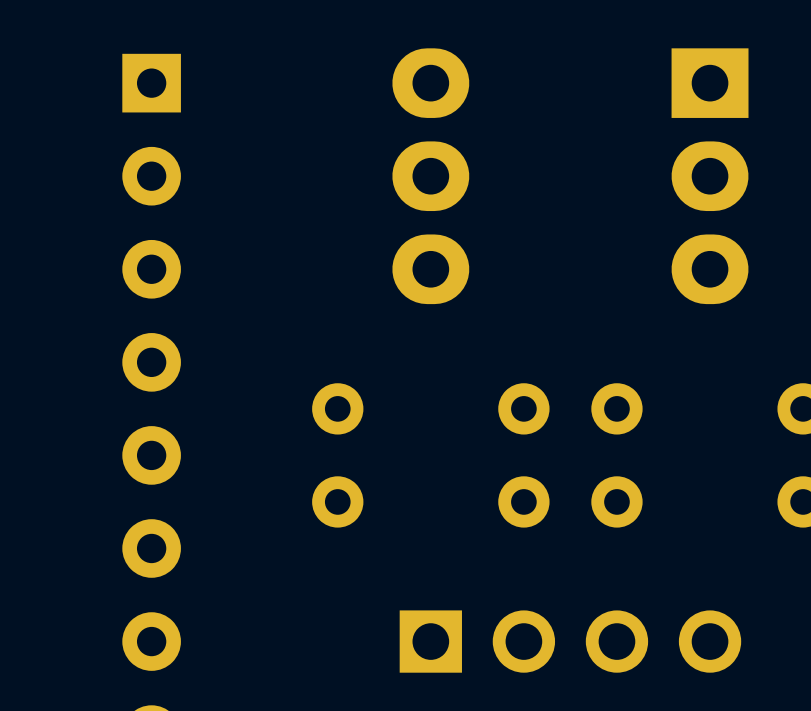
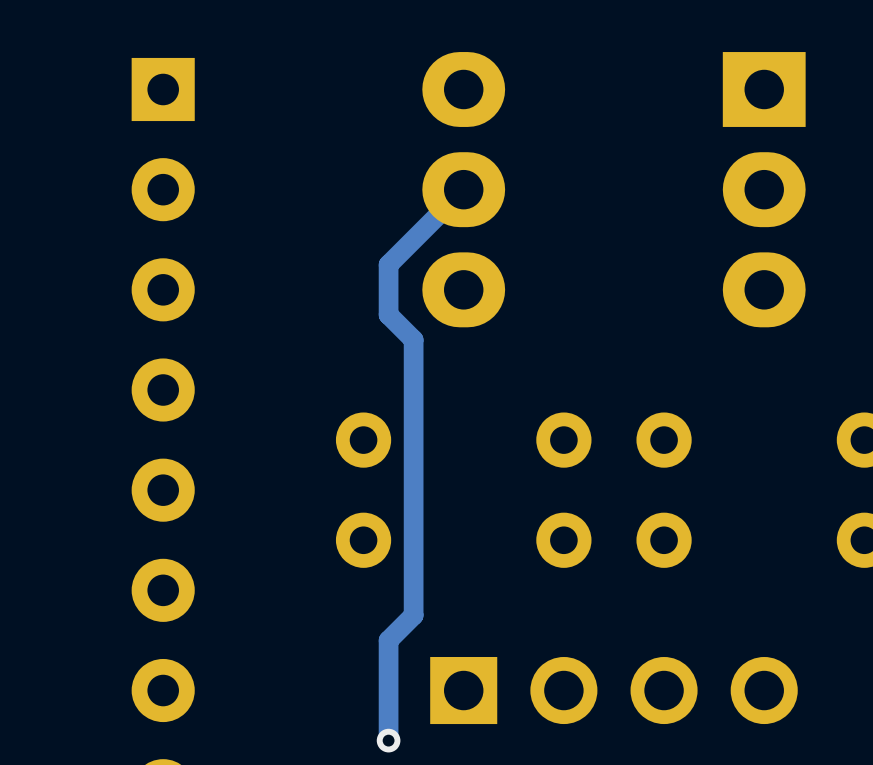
track: none -> (463, 189) (388, 264) (388, 314) (413, 339) (413, 615) (388, 640) (388, 740)
via: none -> (388, 740)

